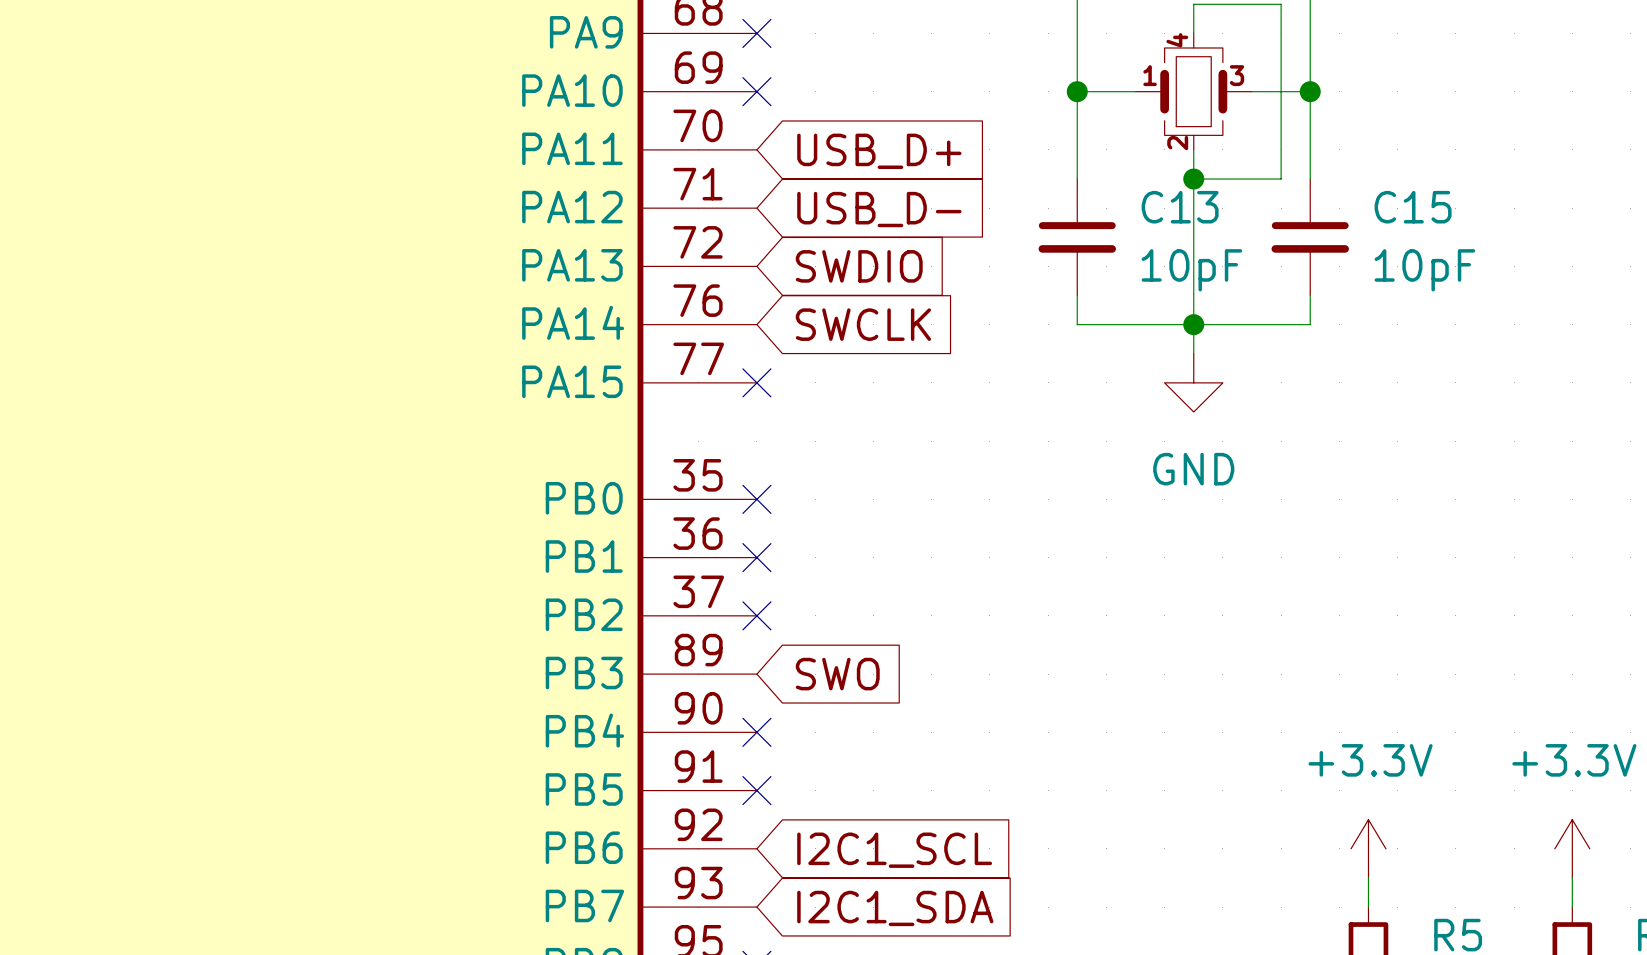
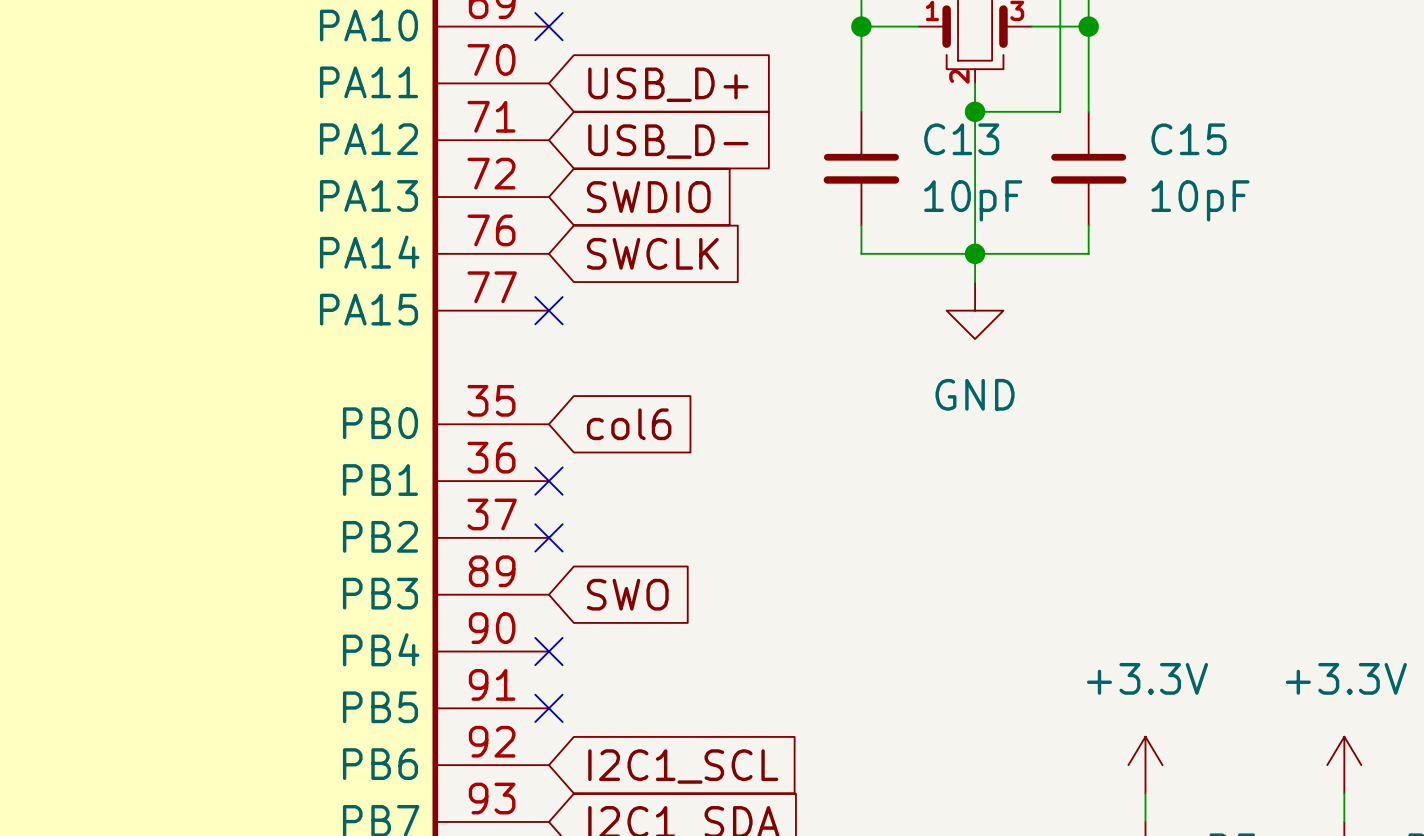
no-connect mark: (756, 499) -> none
global label: none -> col6 (629, 424)

